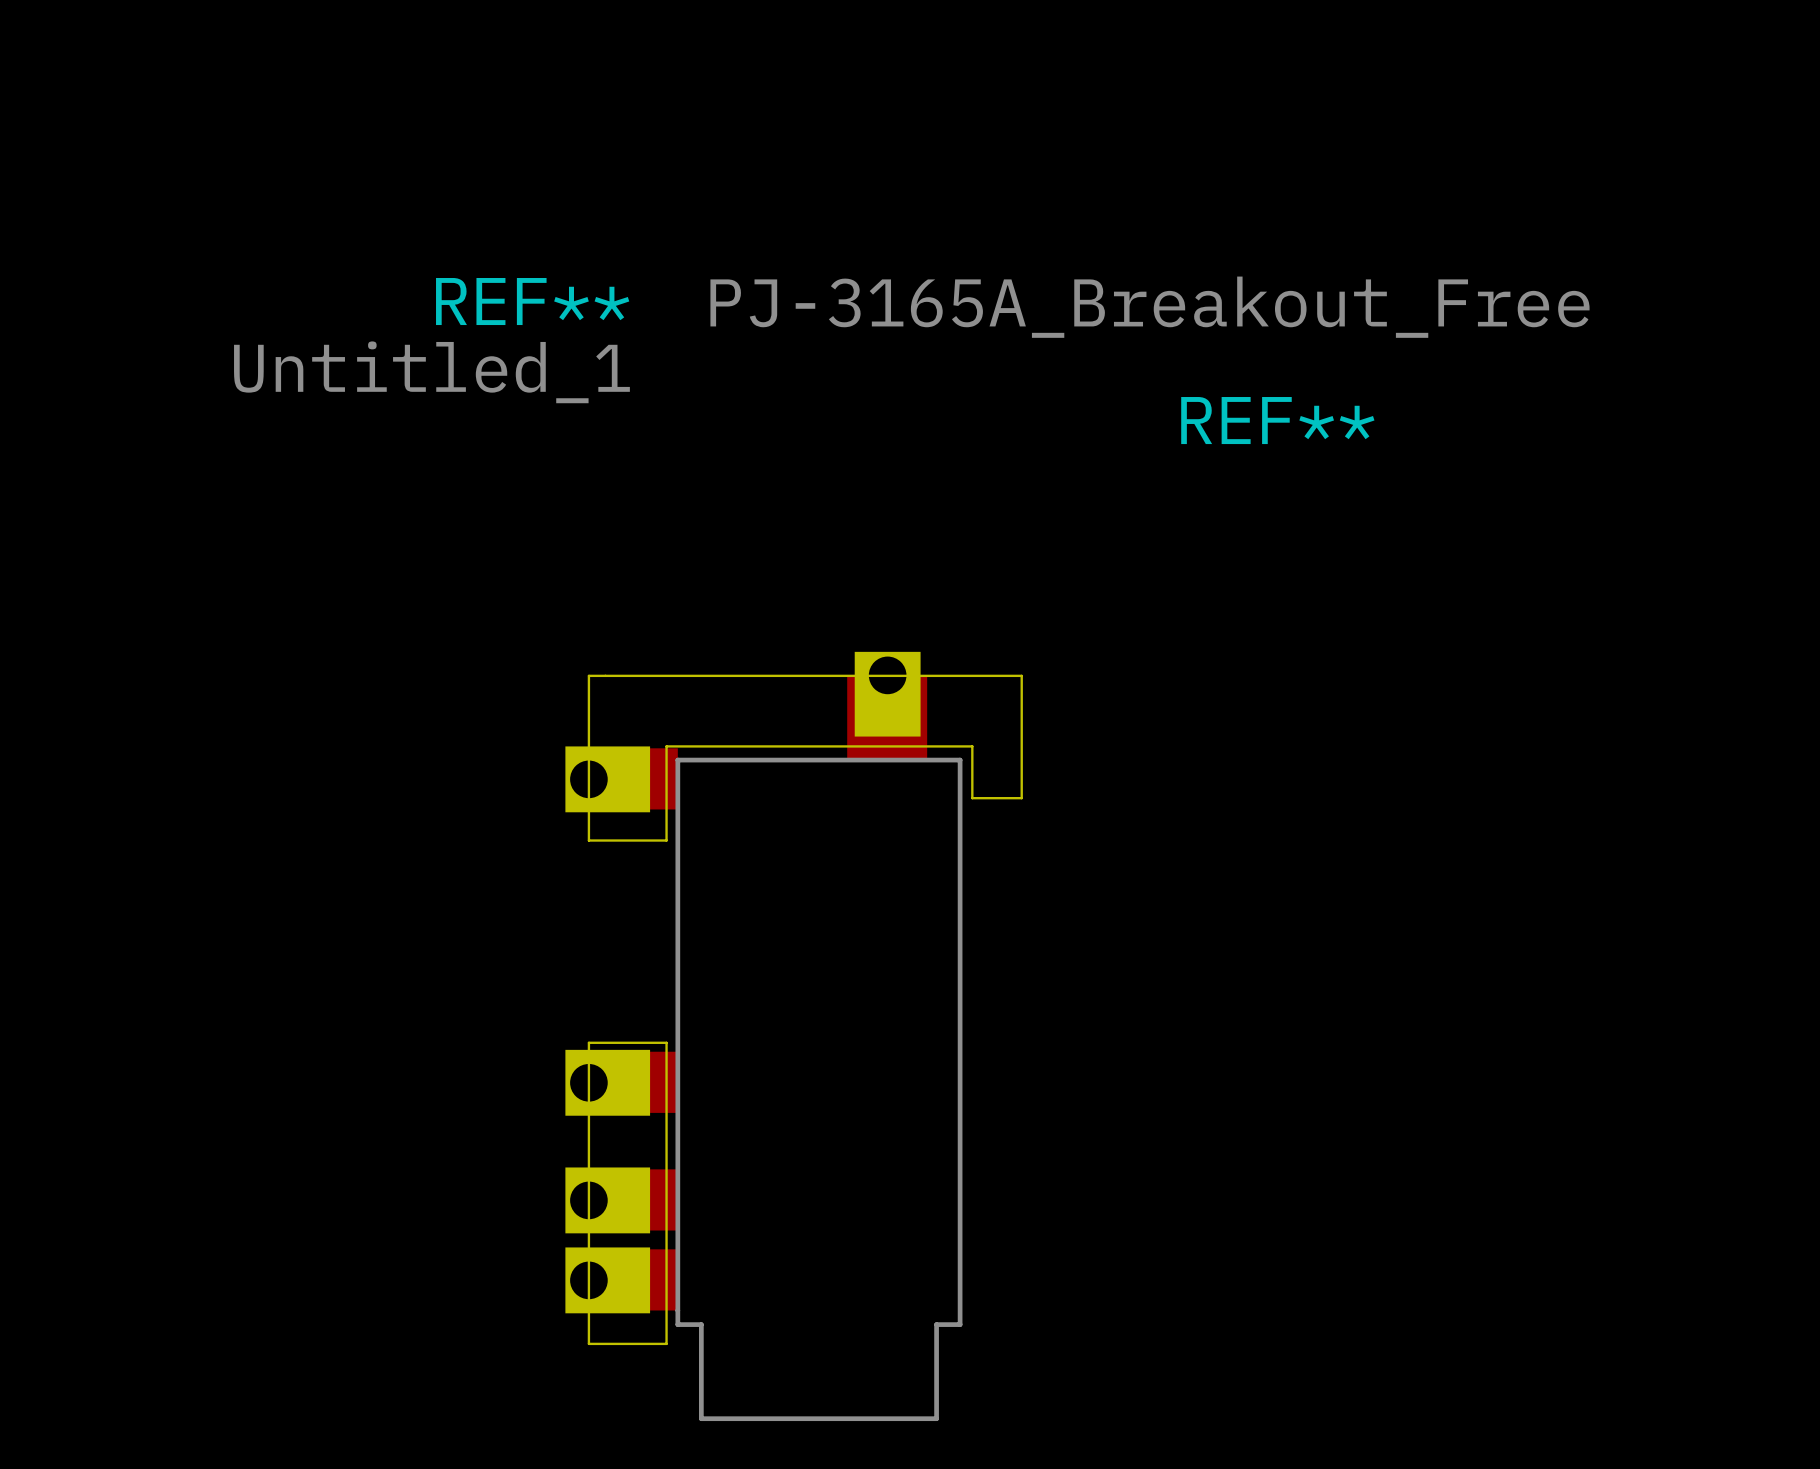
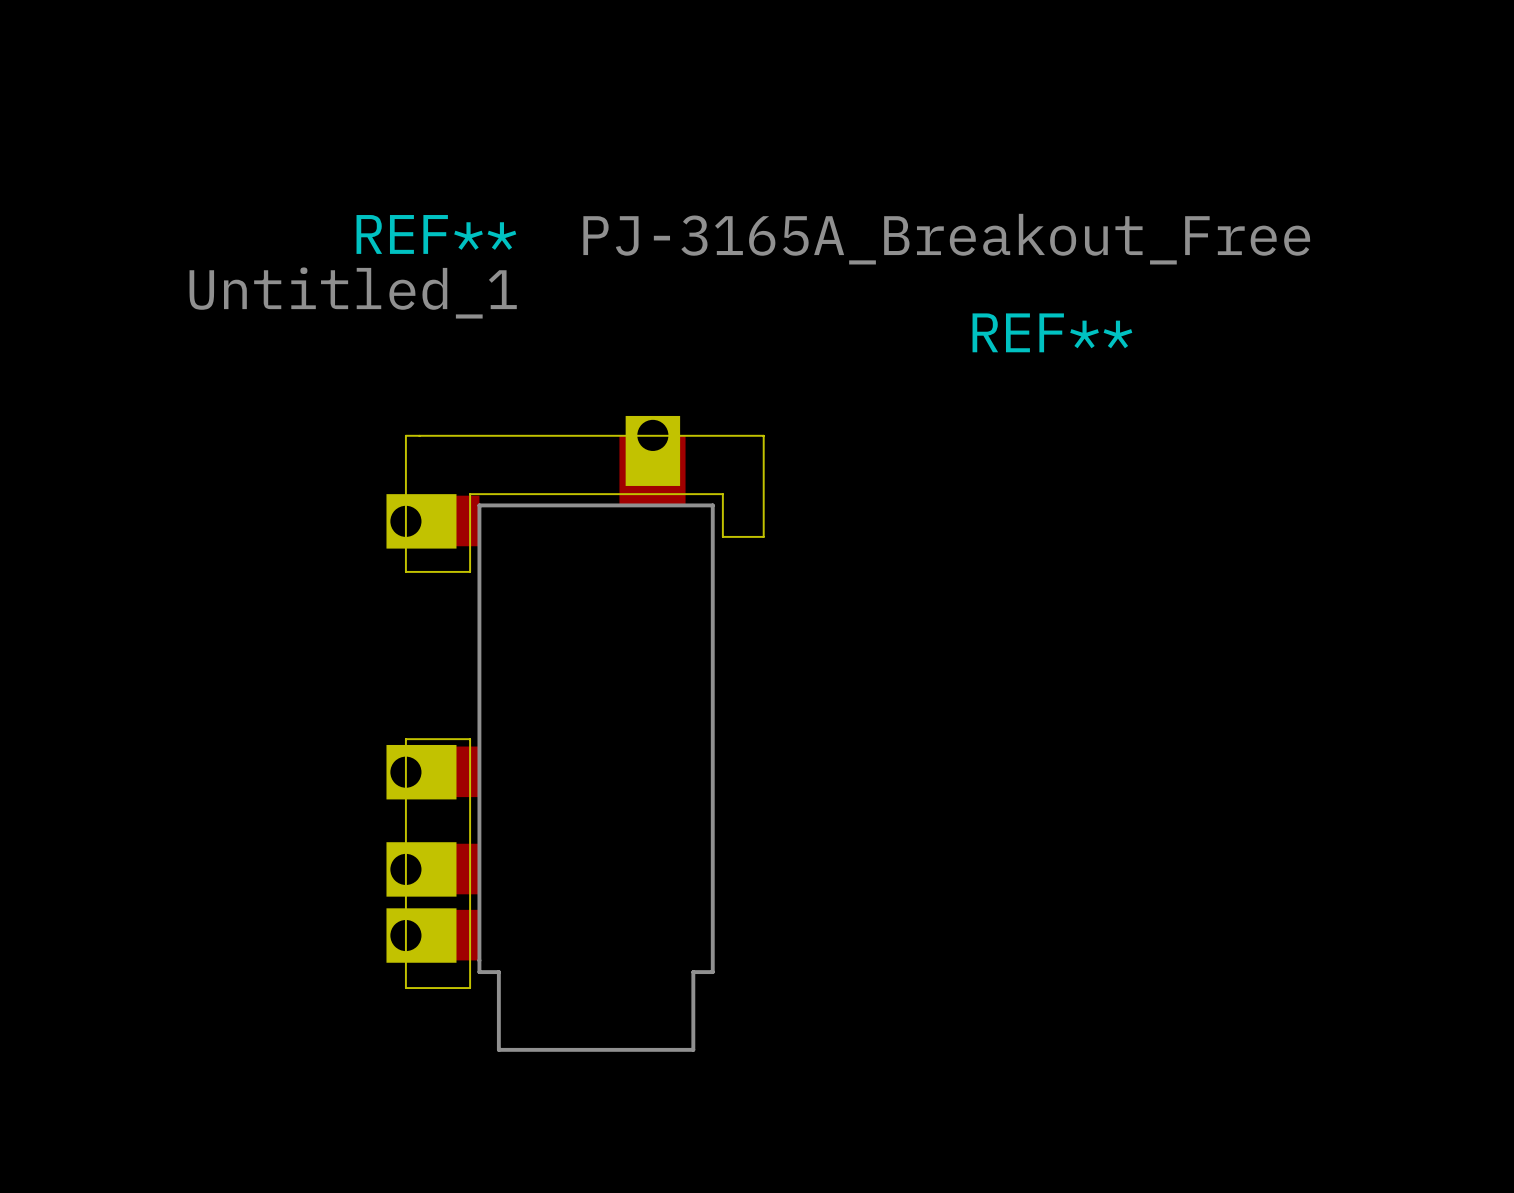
REF** name position: REF** (532, 301) -> REF** (436, 234)
REF** value position: PJ-3165A_Breakout_Free (1149, 307) -> PJ-3165A_Breakout_Free (946, 239)
REF** value position: Untitled_1 (431, 372) -> Untitled_1 (353, 292)
REF** name position: REF** (1277, 420) -> REF** (1052, 332)

